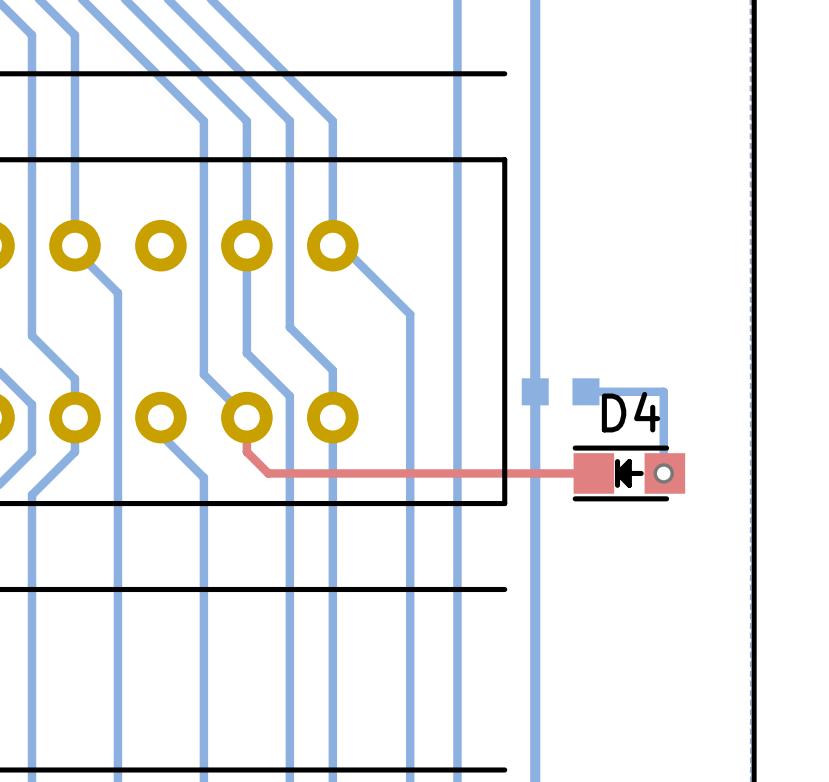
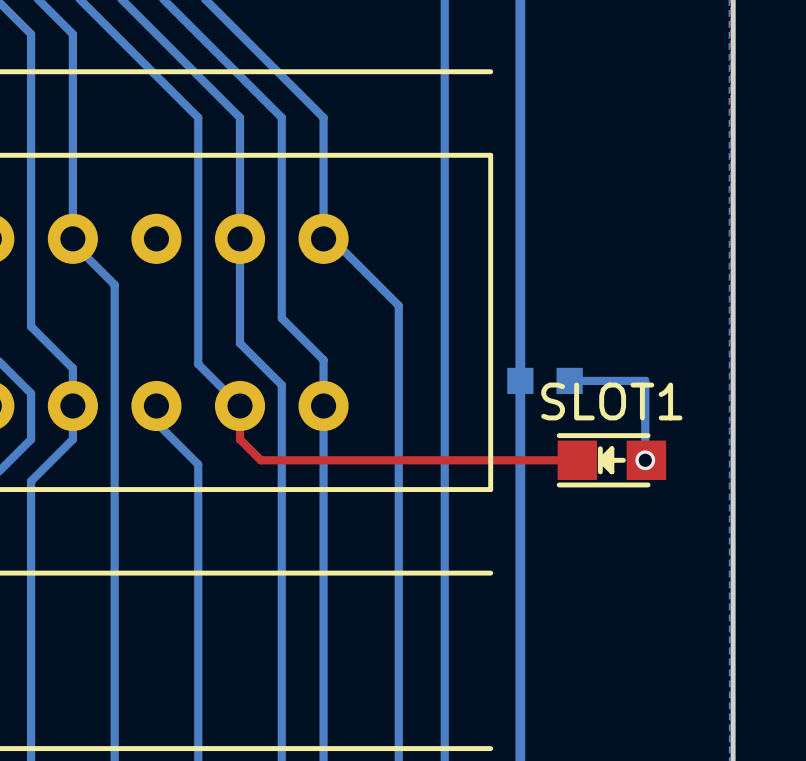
D4 name: D4 (630, 412) -> SLOT1 (611, 401)

